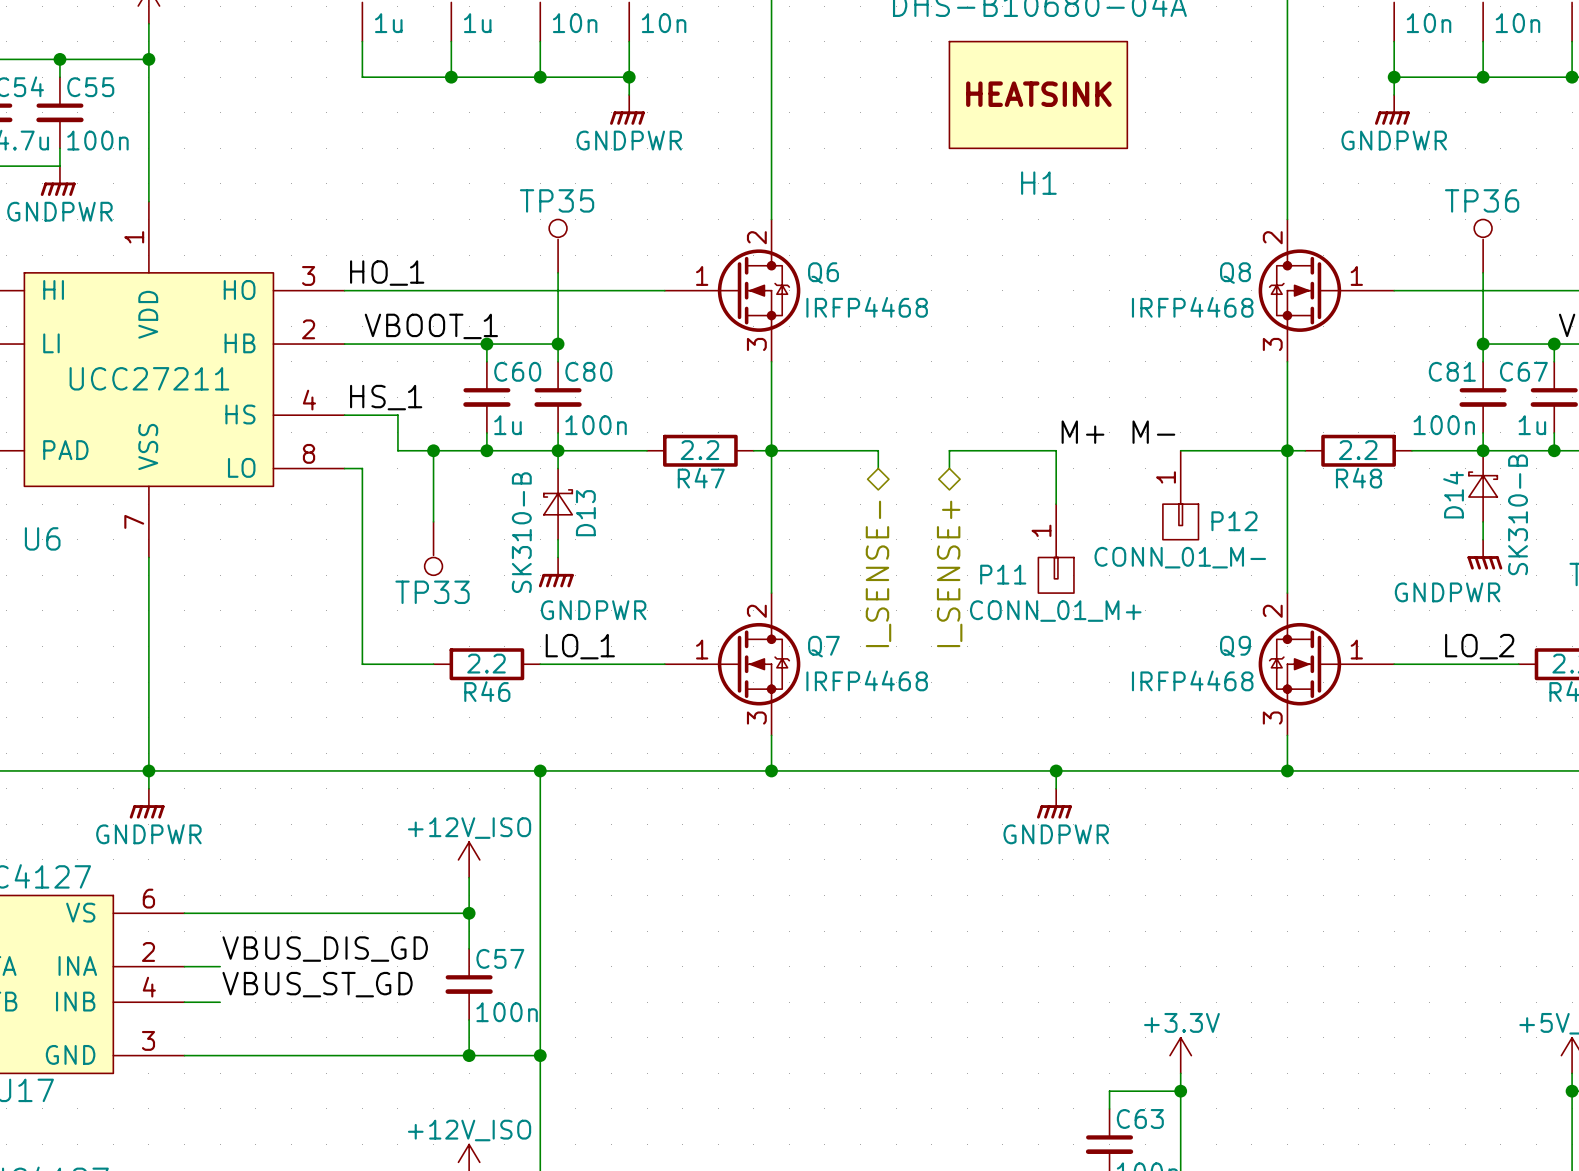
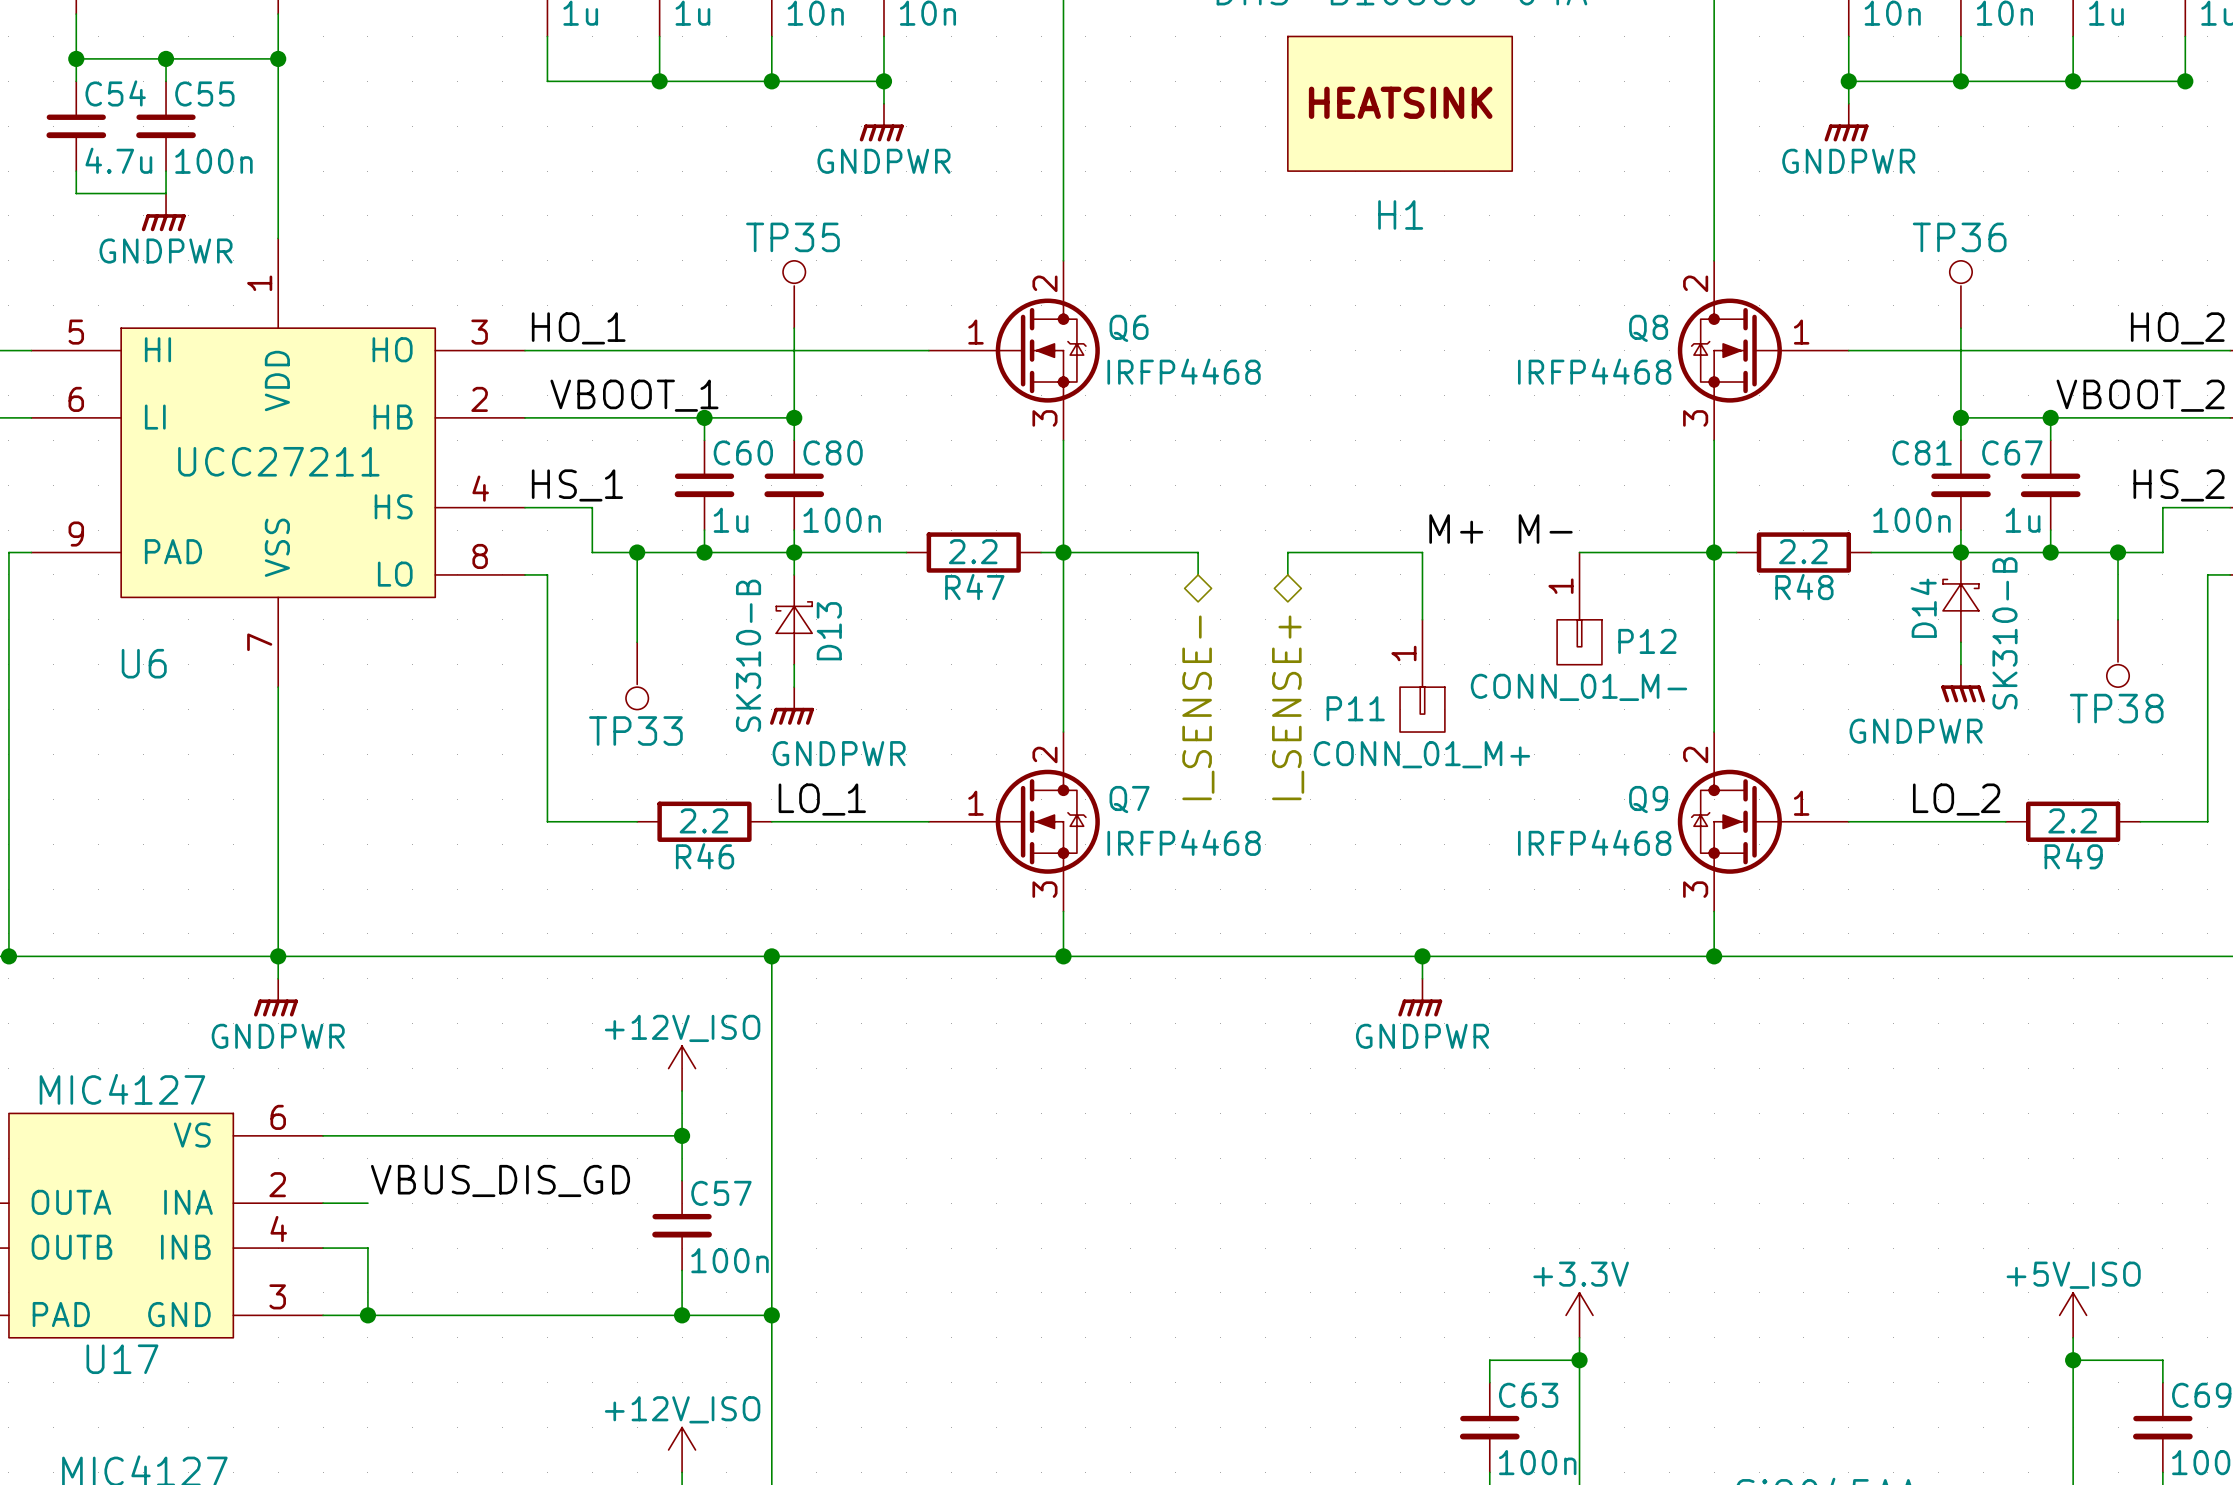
label: VBUS_ST_GD (317, 984) -> none
wire: none -> (367, 1248) (367, 1315)
junction: none -> (367, 1315)

